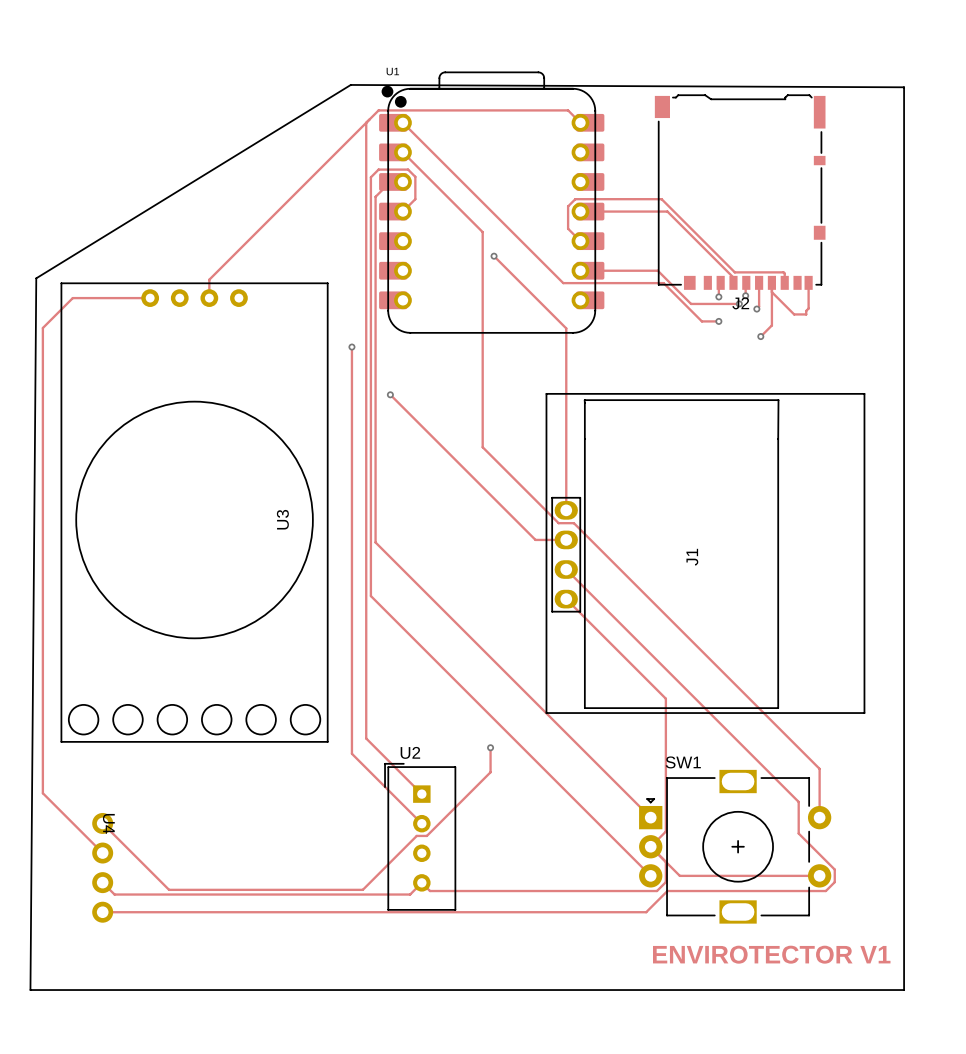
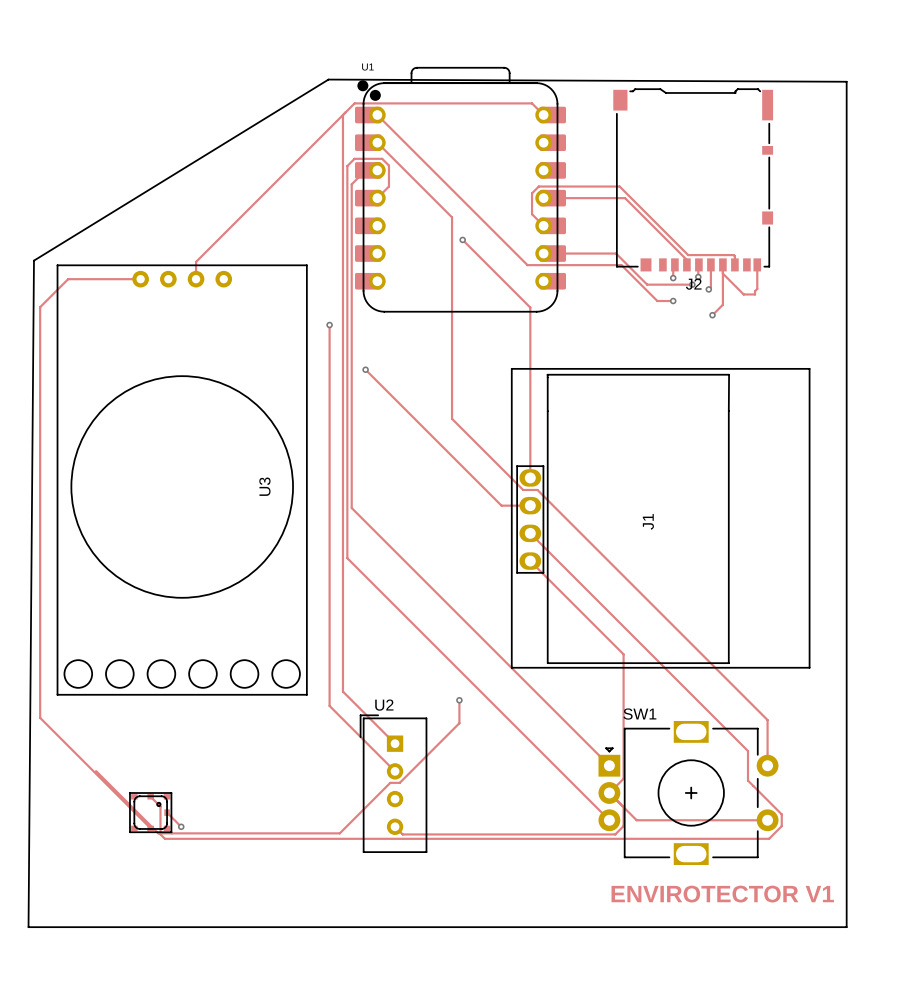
track: (42, 766) (42, 793) (102, 853) -> (40, 717) (150, 828) (148, 830)
U4: (102, 867) -> none
part: none -> (150, 812)
track: none -> (167, 812) (181, 826)
track: (102, 882) (114, 894) (410, 894) (421, 882) -> none
via: none -> (181, 826)
track: (825, 891) (667, 891) (646, 912) (102, 912) -> (773, 834) (769, 838) (164, 838) (160, 834) (160, 806) (150, 796)

